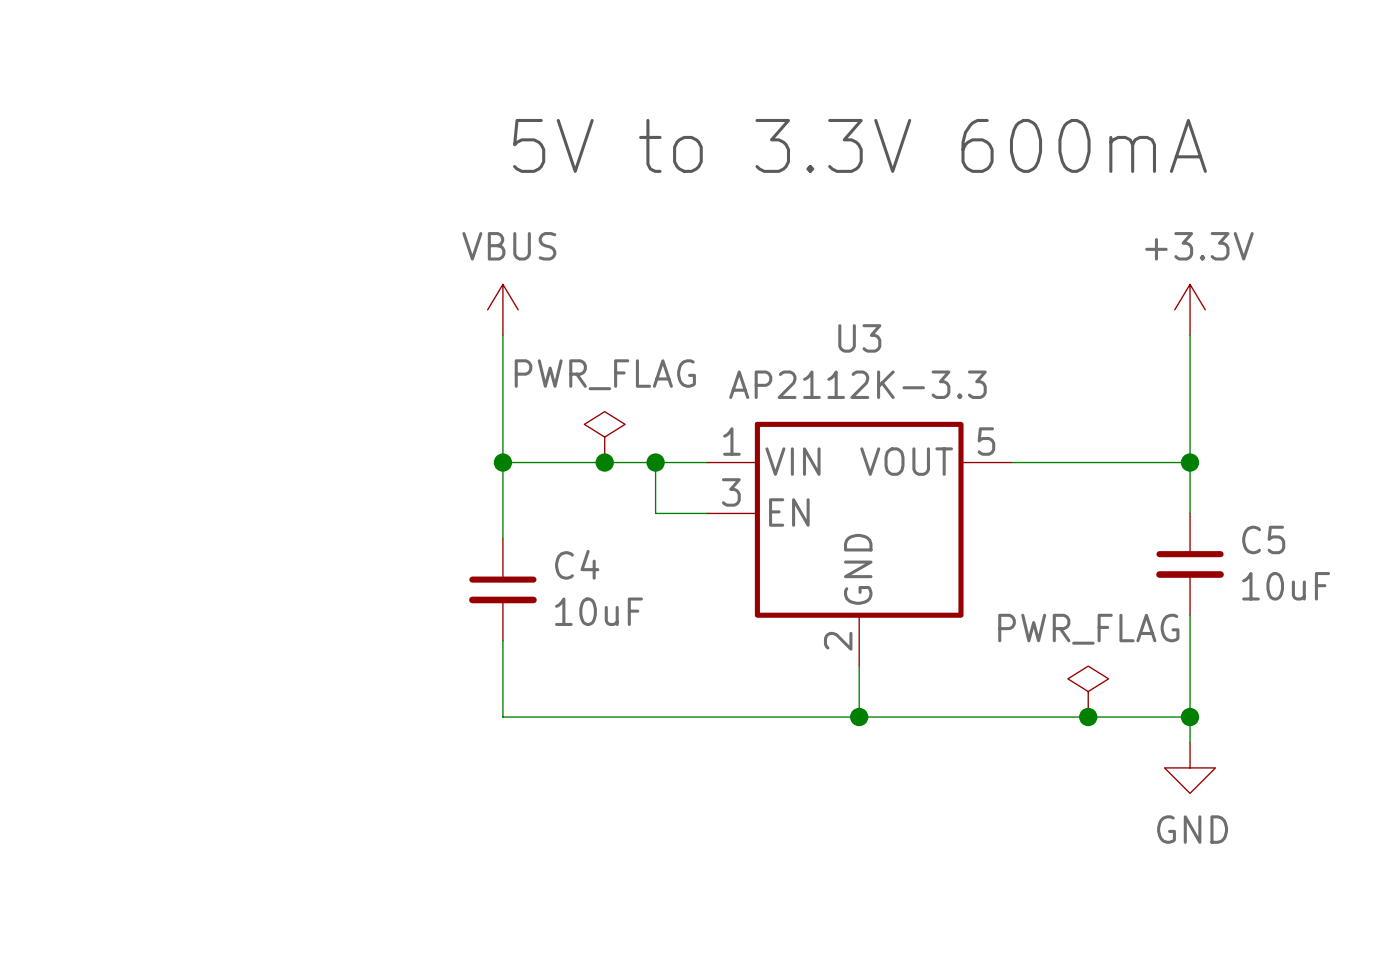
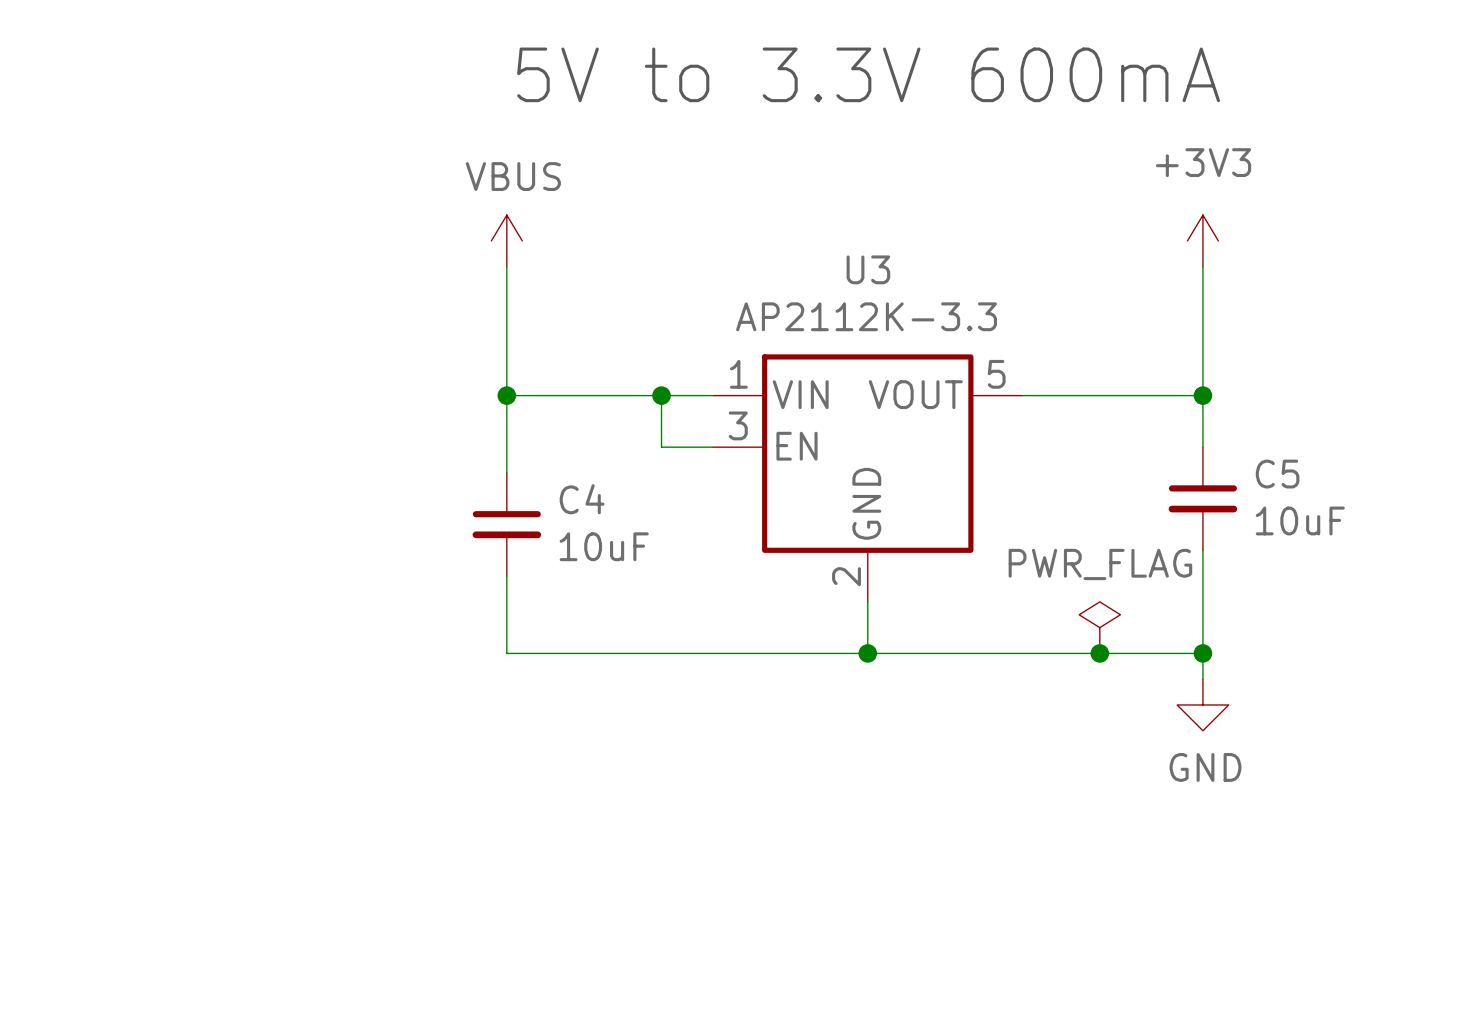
power symbol: +3.3V (1190, 309) -> +3V3 (1202, 240)
power symbol: PWR_FLAG (604, 437) -> none
junction: (604, 462) -> none

